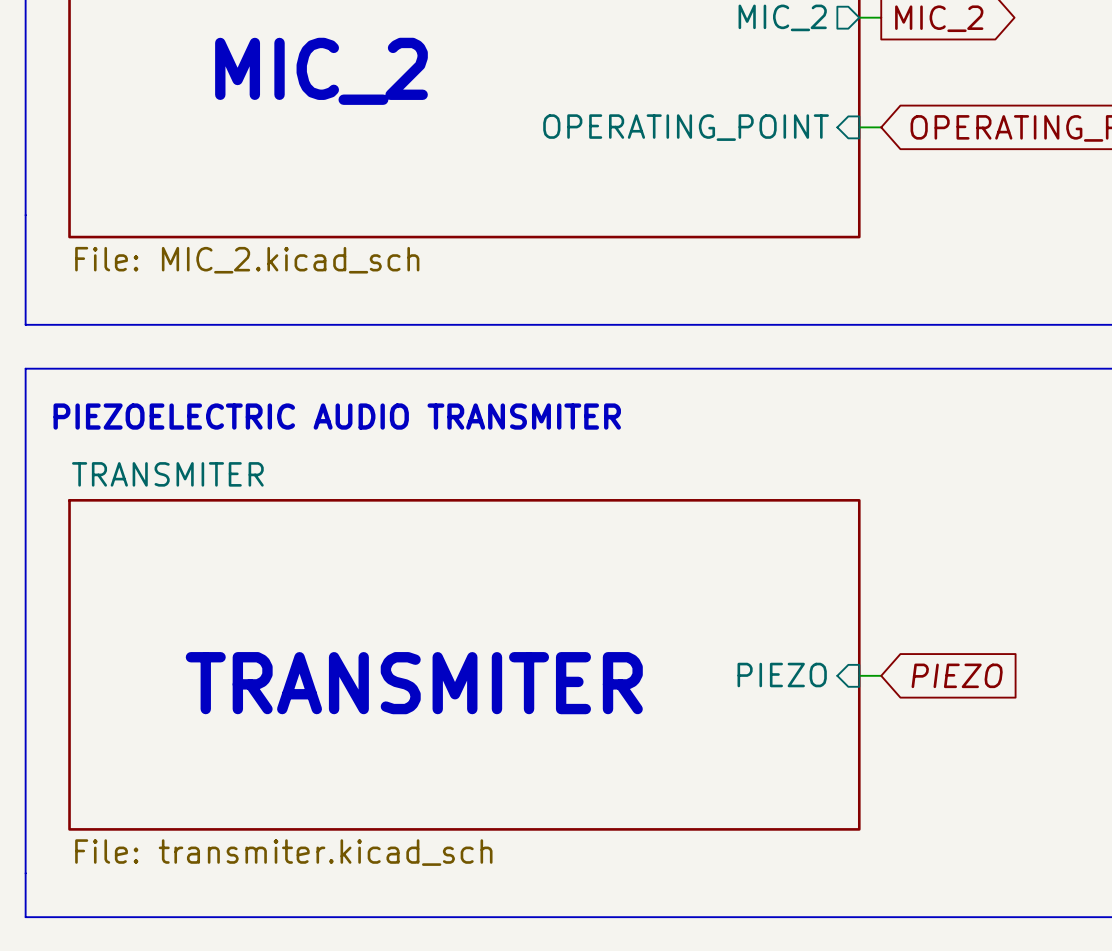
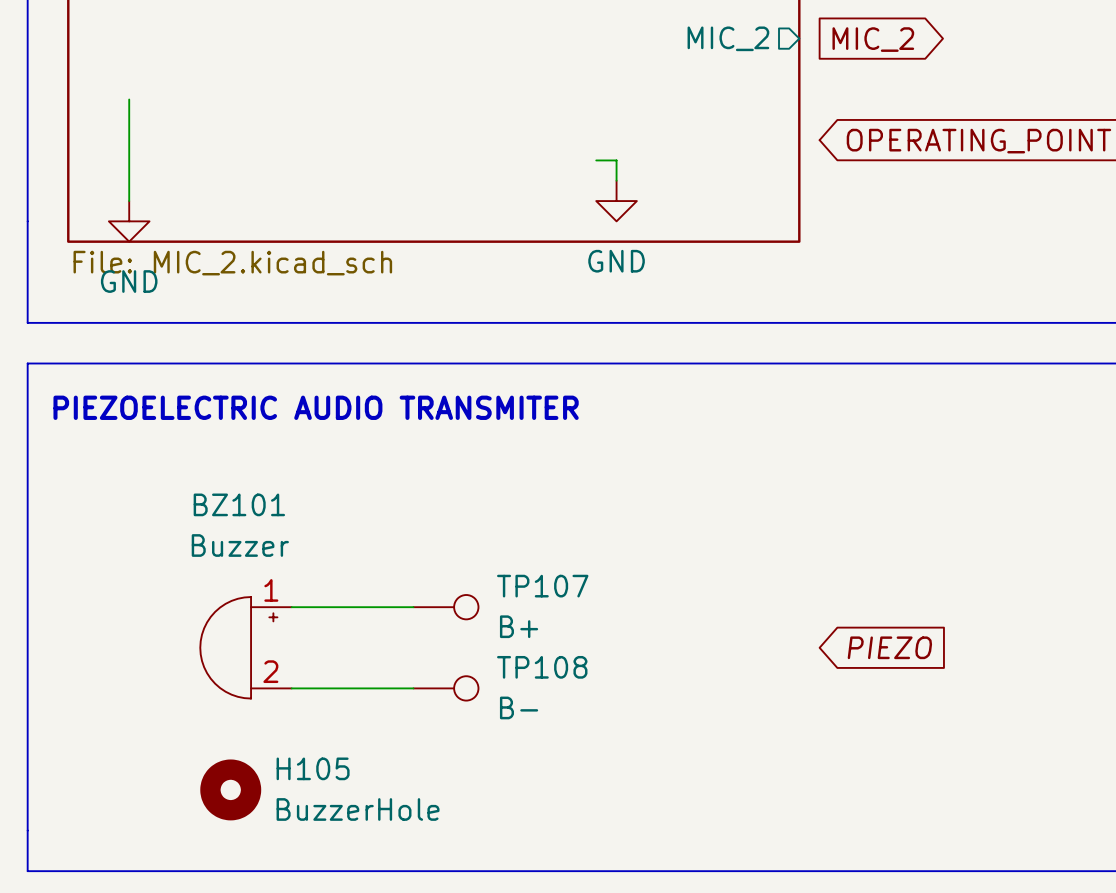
wire: (859, 17) (881, 17) -> none
text: MIC_2 (321, 71) -> none
wire: none -> (129, 99) (129, 201)
sheet pin: OPERATING_POINT (686, 127) -> none
wire: (859, 127) (881, 127) -> none
wire: none -> (596, 160) (616, 160) (616, 180)
power symbol: none -> GND (616, 201)
power symbol: none -> GND (129, 221)
wire: none -> (291, 607) (413, 607)
TP107: none -> B+ (445, 607)
sheet TRANSMITER: File: transmiter.kicad_sch (464, 664) -> none
BZ101: none -> Buzzer (245, 647)
sheet pin: PIEZO (782, 675) -> none
wire: (859, 675) (881, 675) -> none
text: TRANSMITER (414, 683) -> none
wire: none -> (291, 688) (413, 688)
TP108: none -> B- (445, 688)
H105: none -> BuzzerHole (230, 789)

